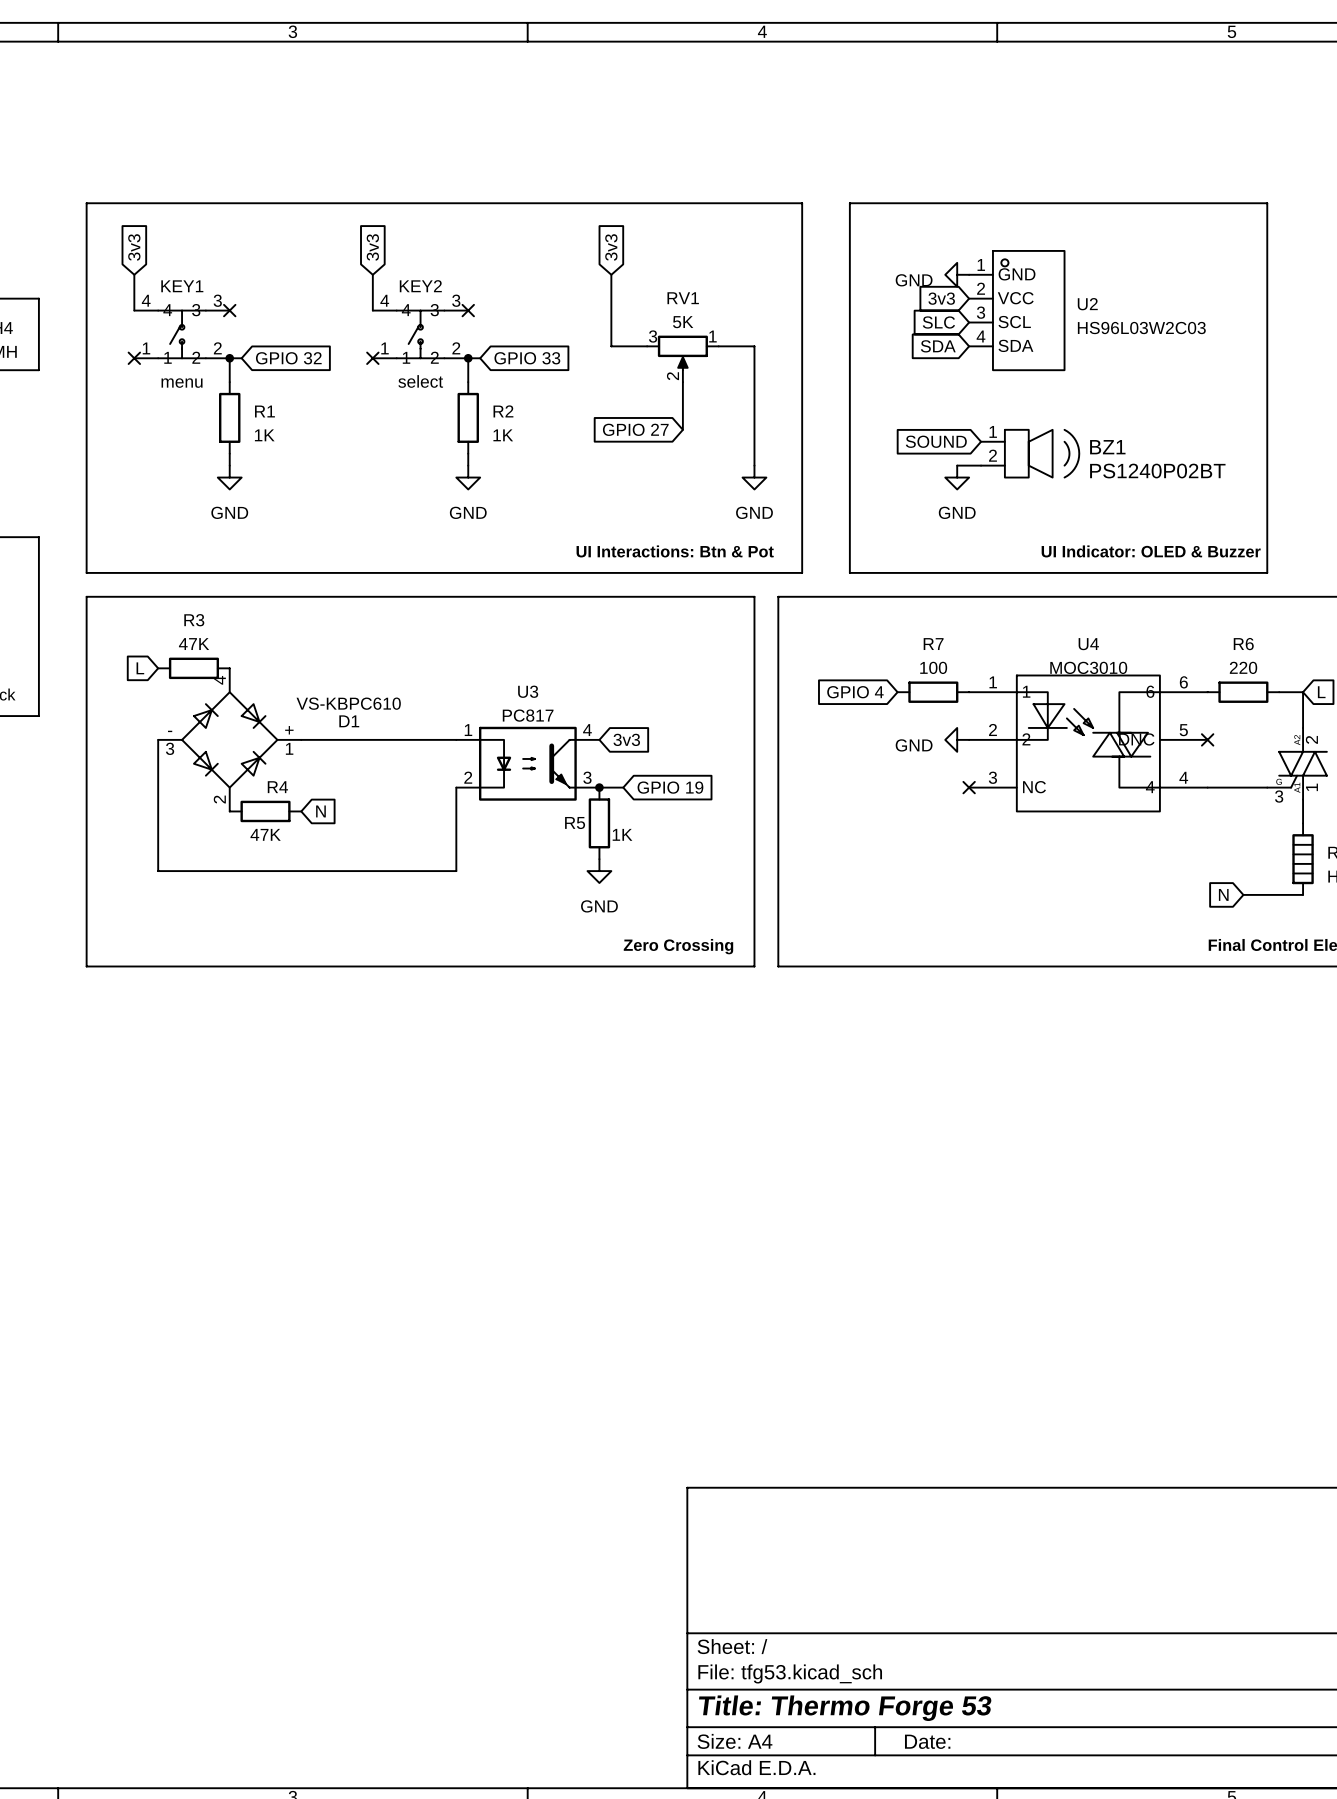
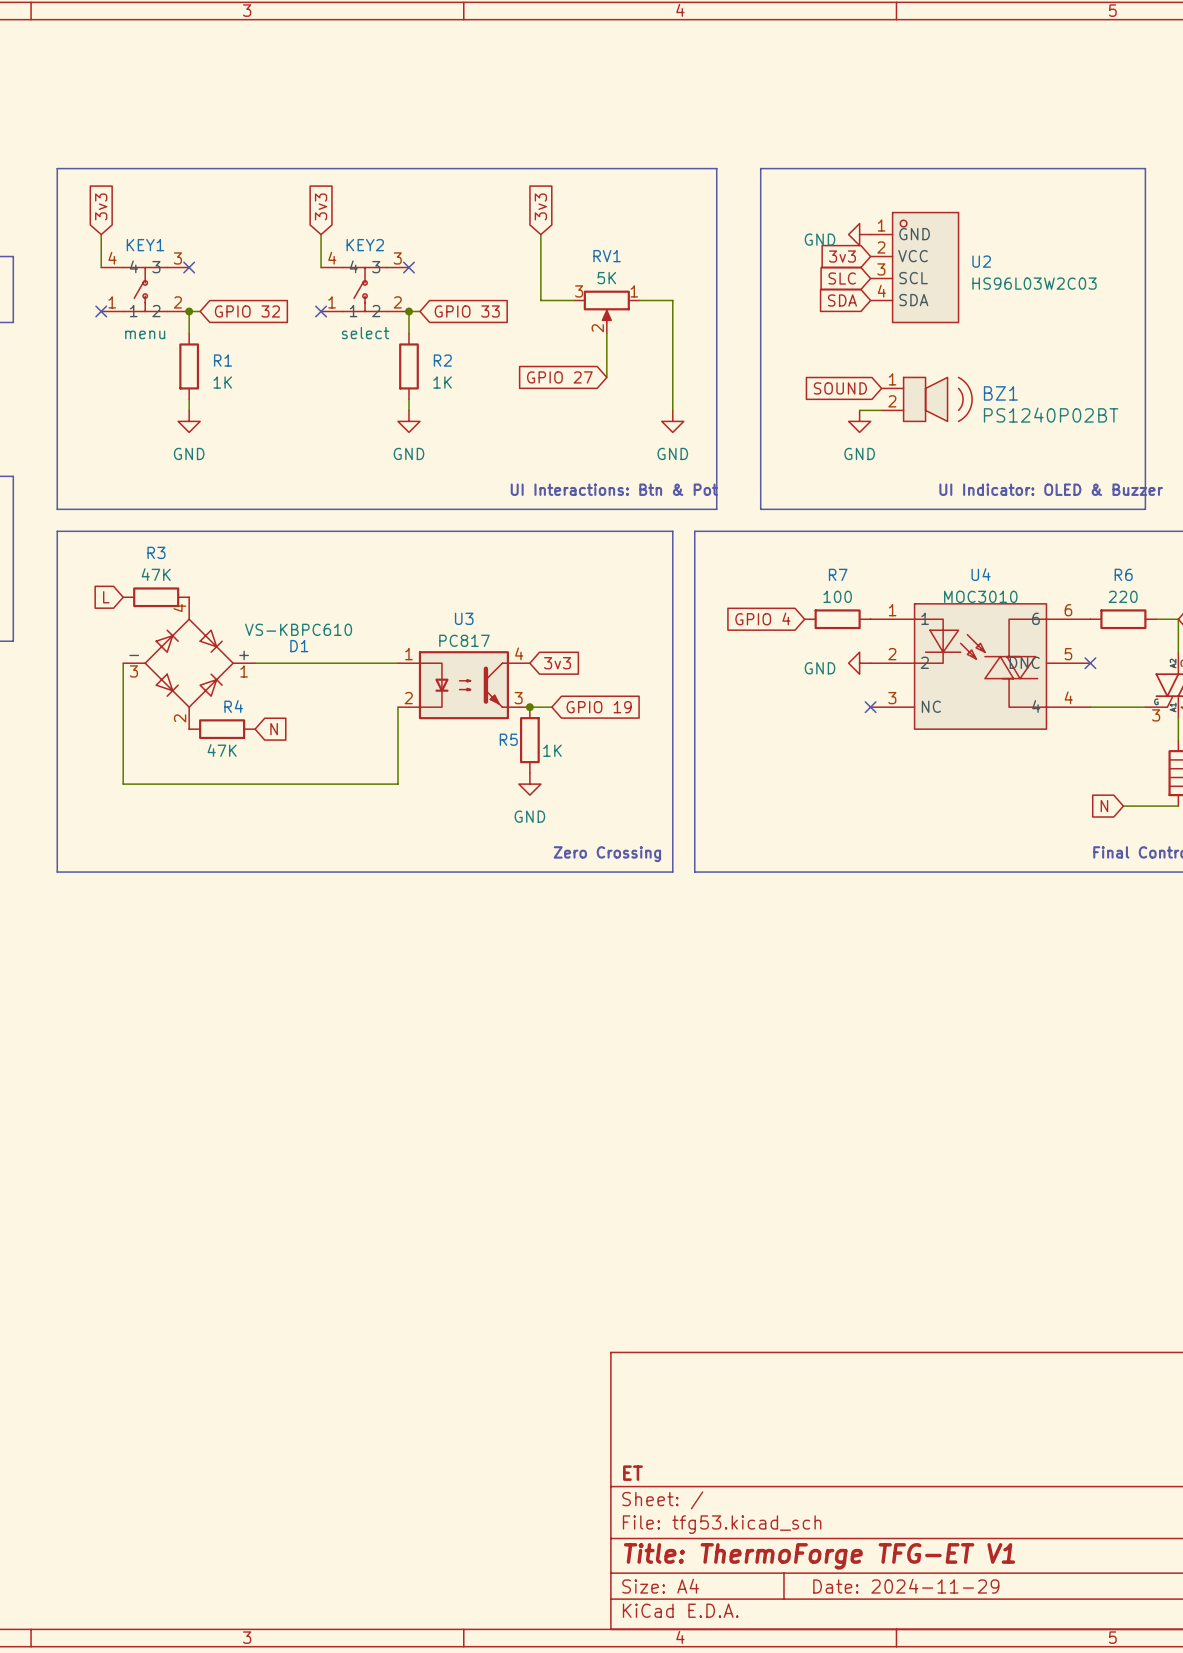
title block: none -> ET (633, 1473)
title block: Title: Thermo Forge 53 (845, 1708) -> Title: ThermoForge TFG-ET V1 (819, 1556)
title block: Date: (927, 1741) -> Date: 2024-11-29 (906, 1586)

